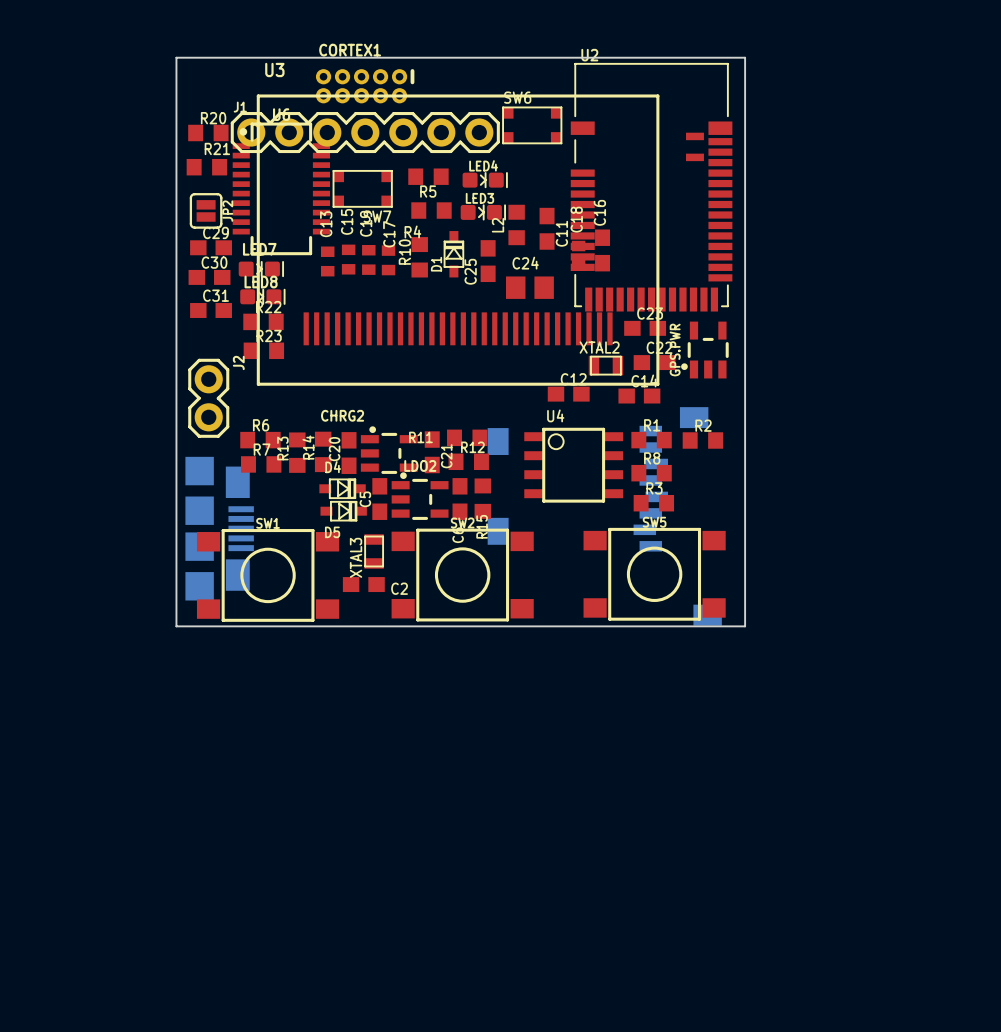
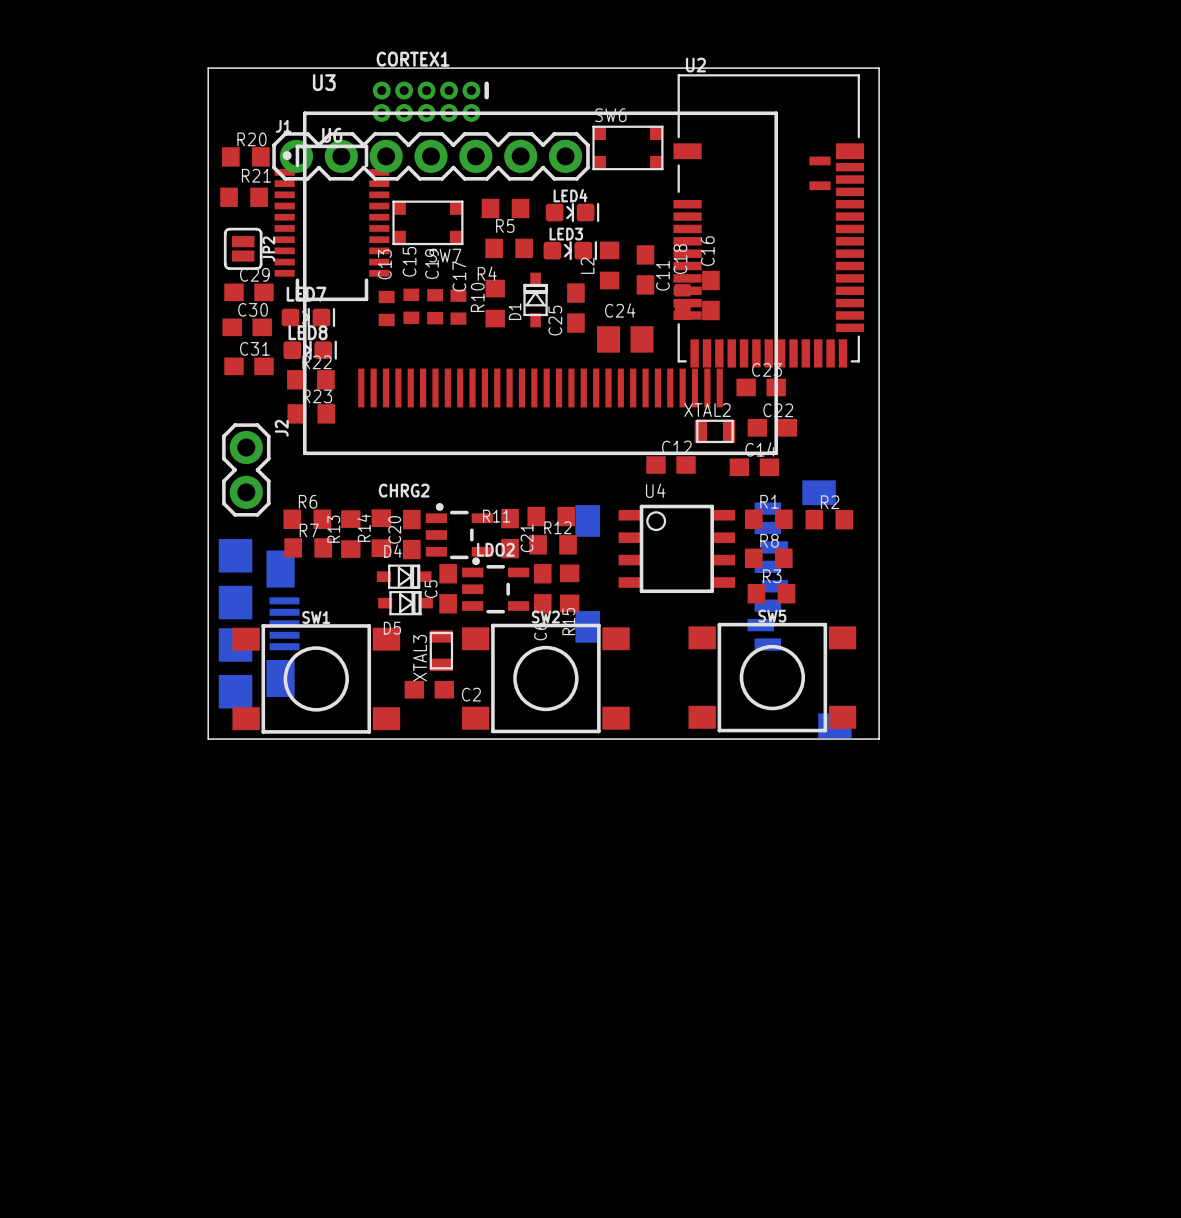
GPS.PWR: (704, 350) -> none

